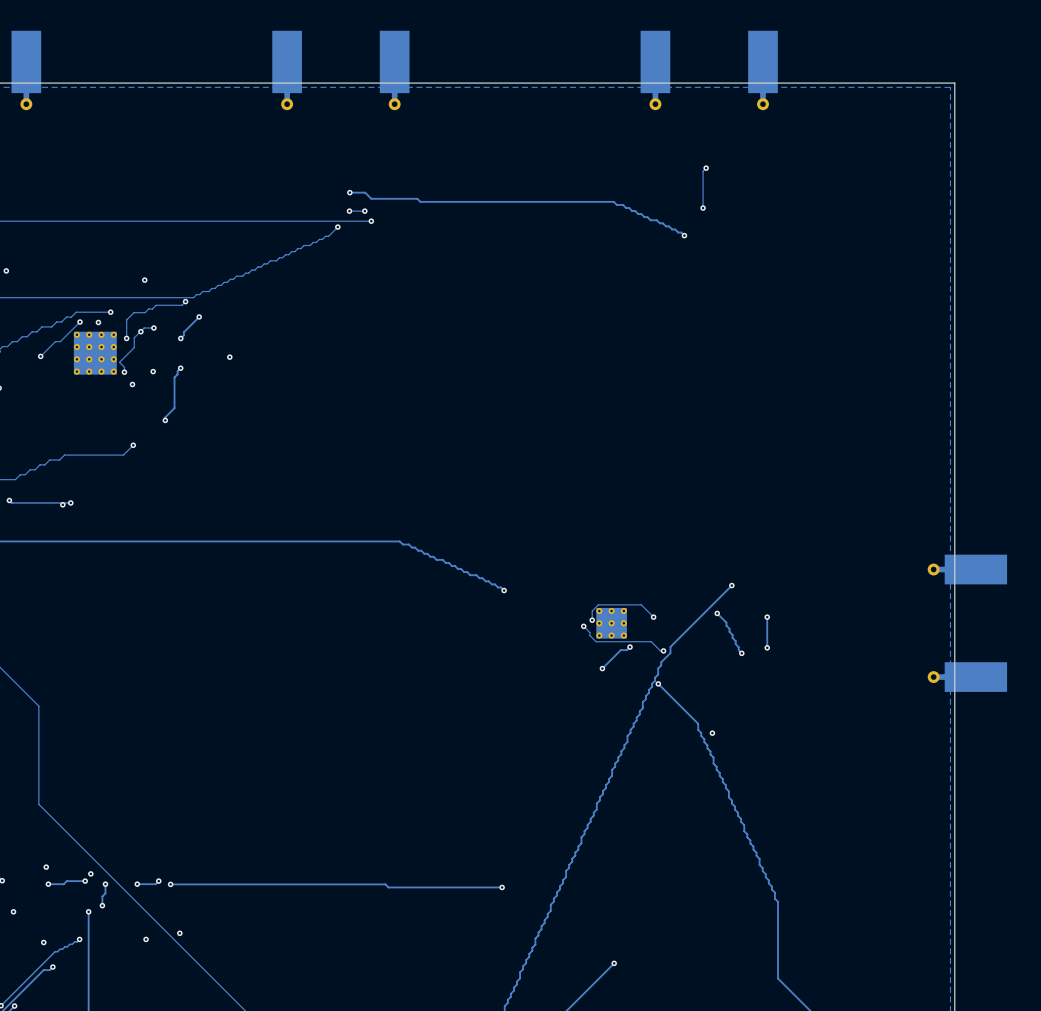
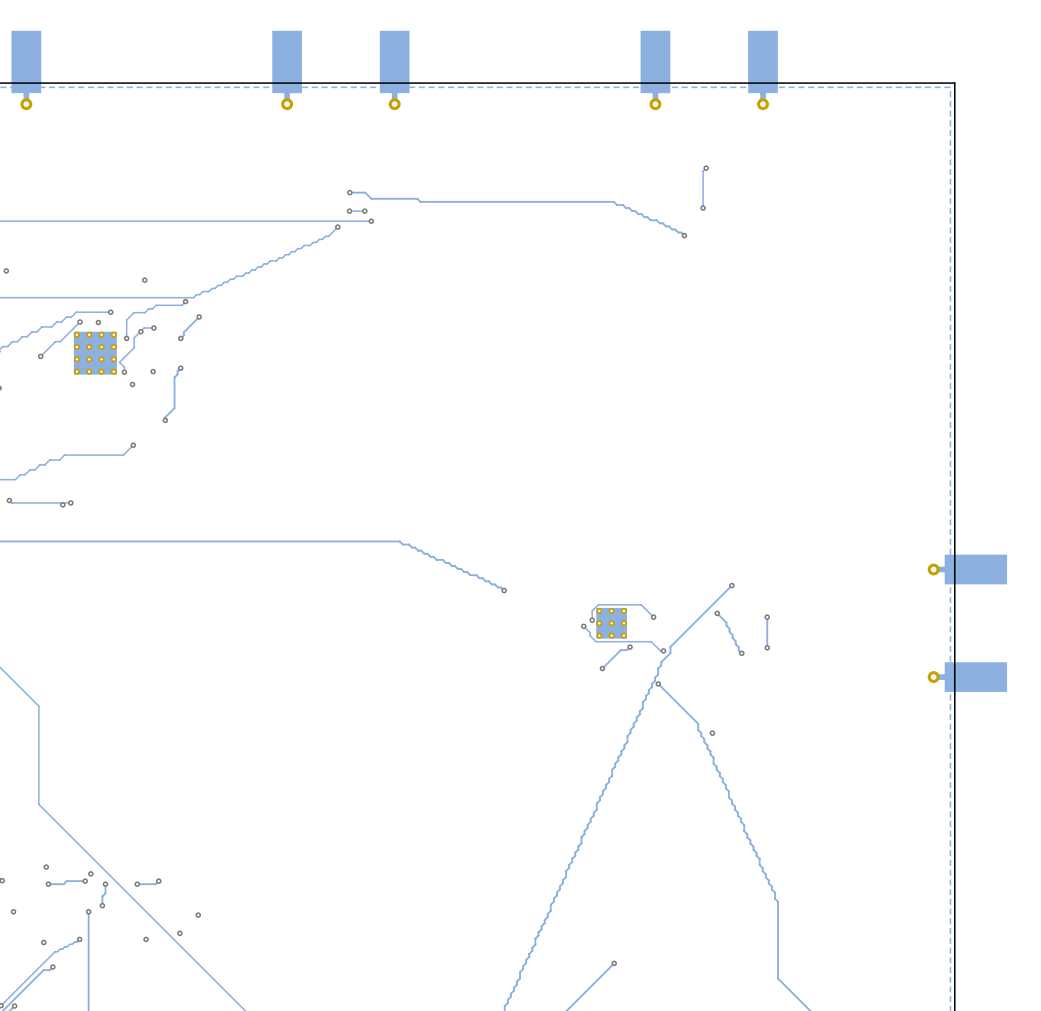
via: (229, 357) -> none
track: (170, 884) (385, 884) (388, 887) (502, 887) -> none
via position: (170, 884) -> (198, 915)
via: (502, 887) -> none

